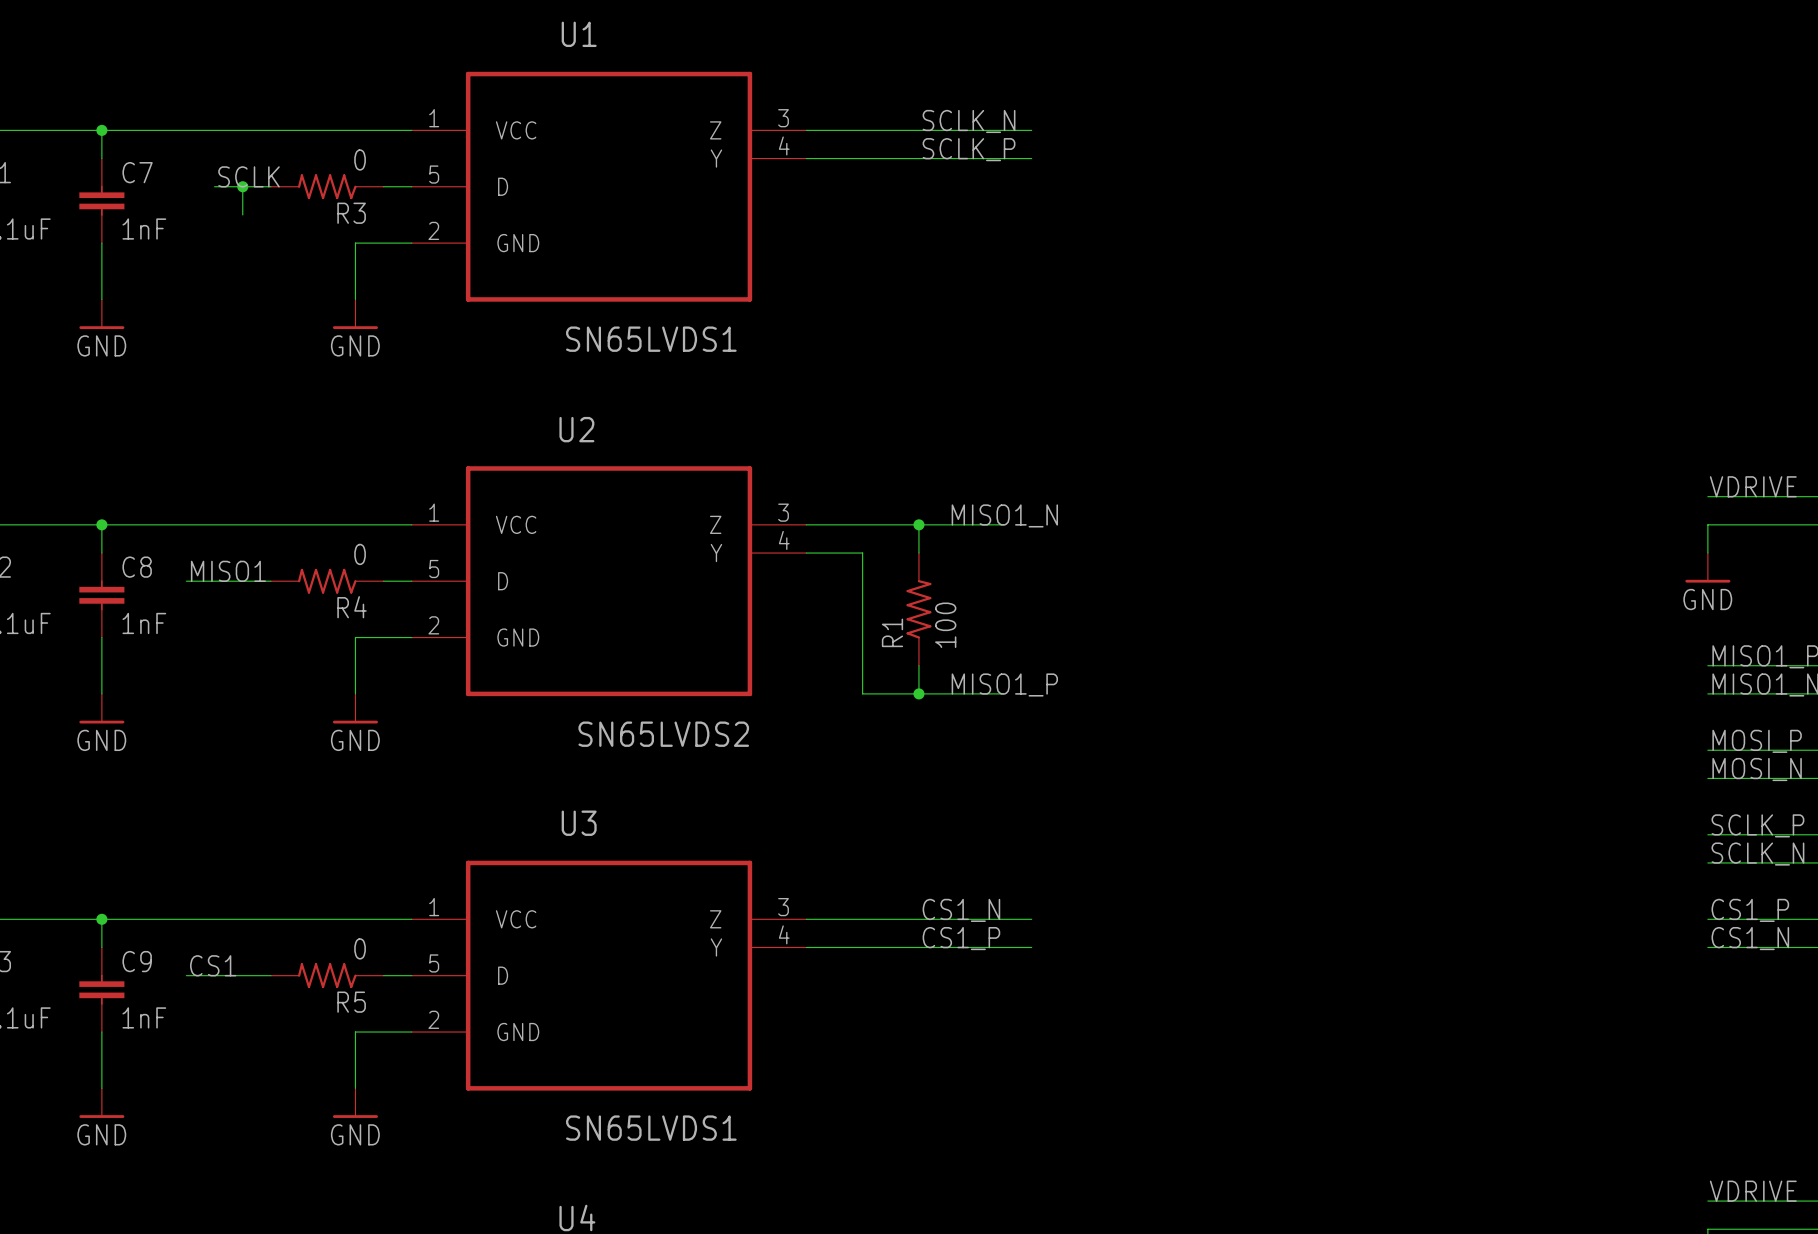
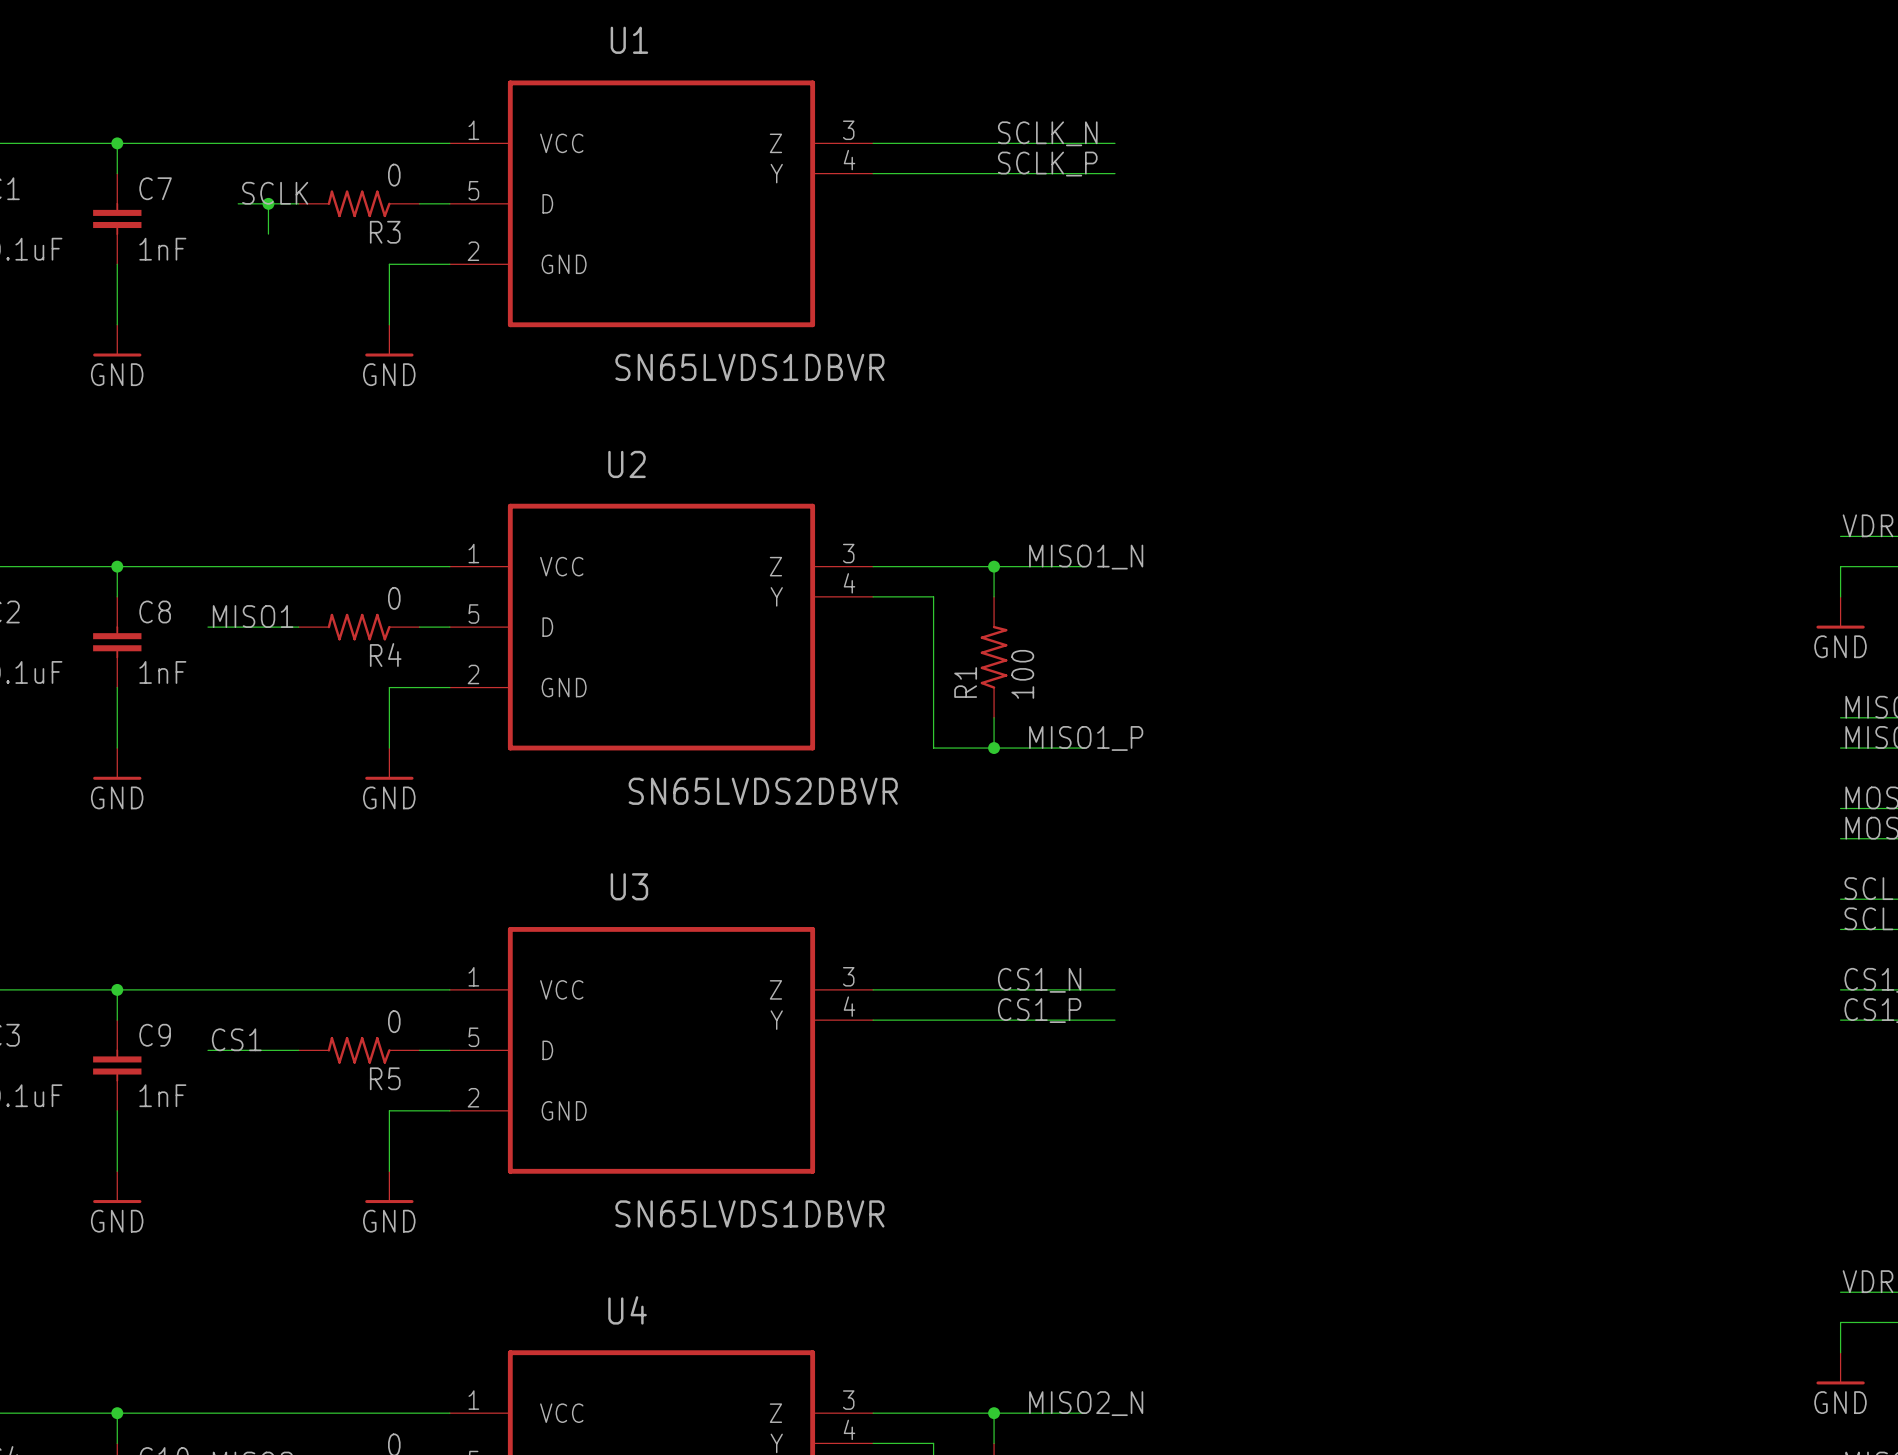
U1 value: SN65LVDS1 (651, 339) -> SN65LVDS1DBVR (749, 367)
U2 value: SN65LVDS2 (663, 734) -> SN65LVDS2DBVR (763, 791)
U3 value: SN65LVDS1 (651, 1128) -> SN65LVDS1DBVR (749, 1213)

